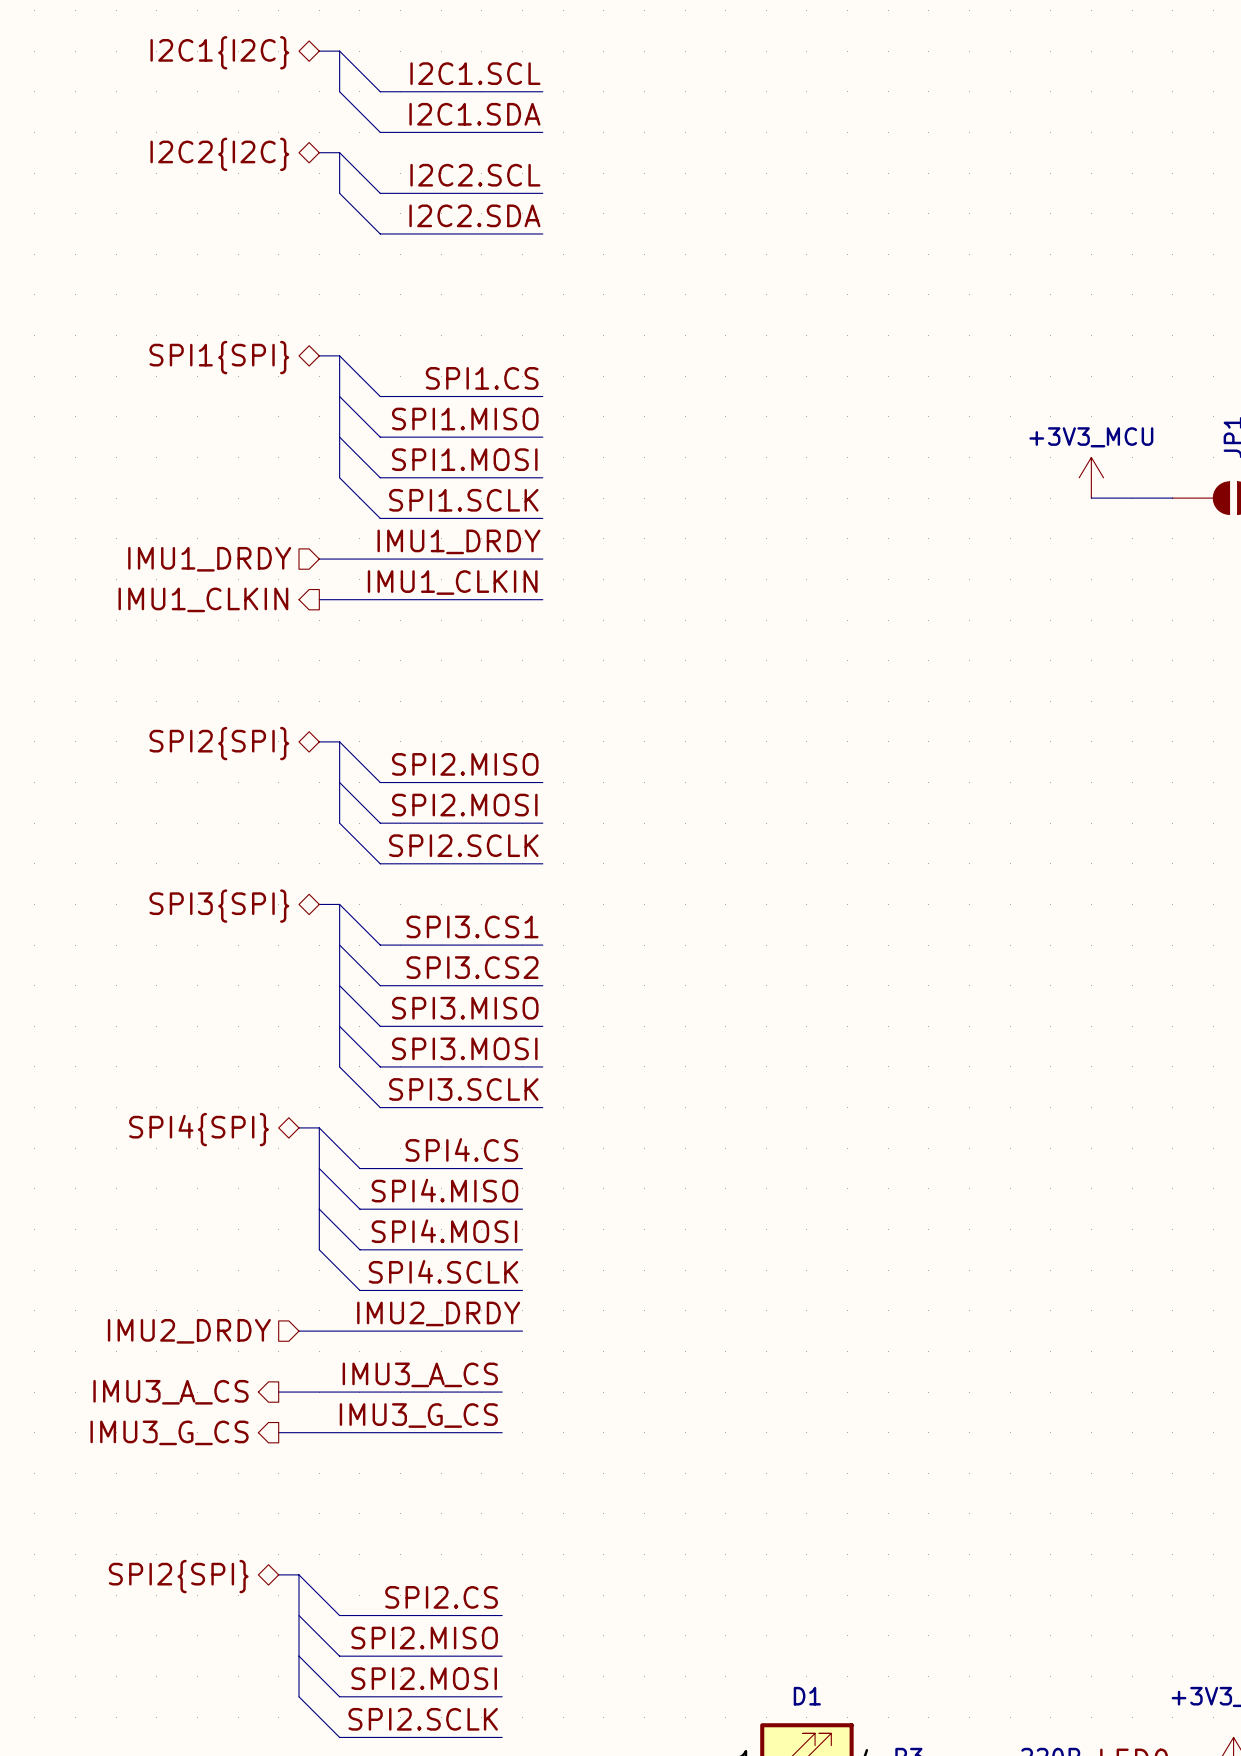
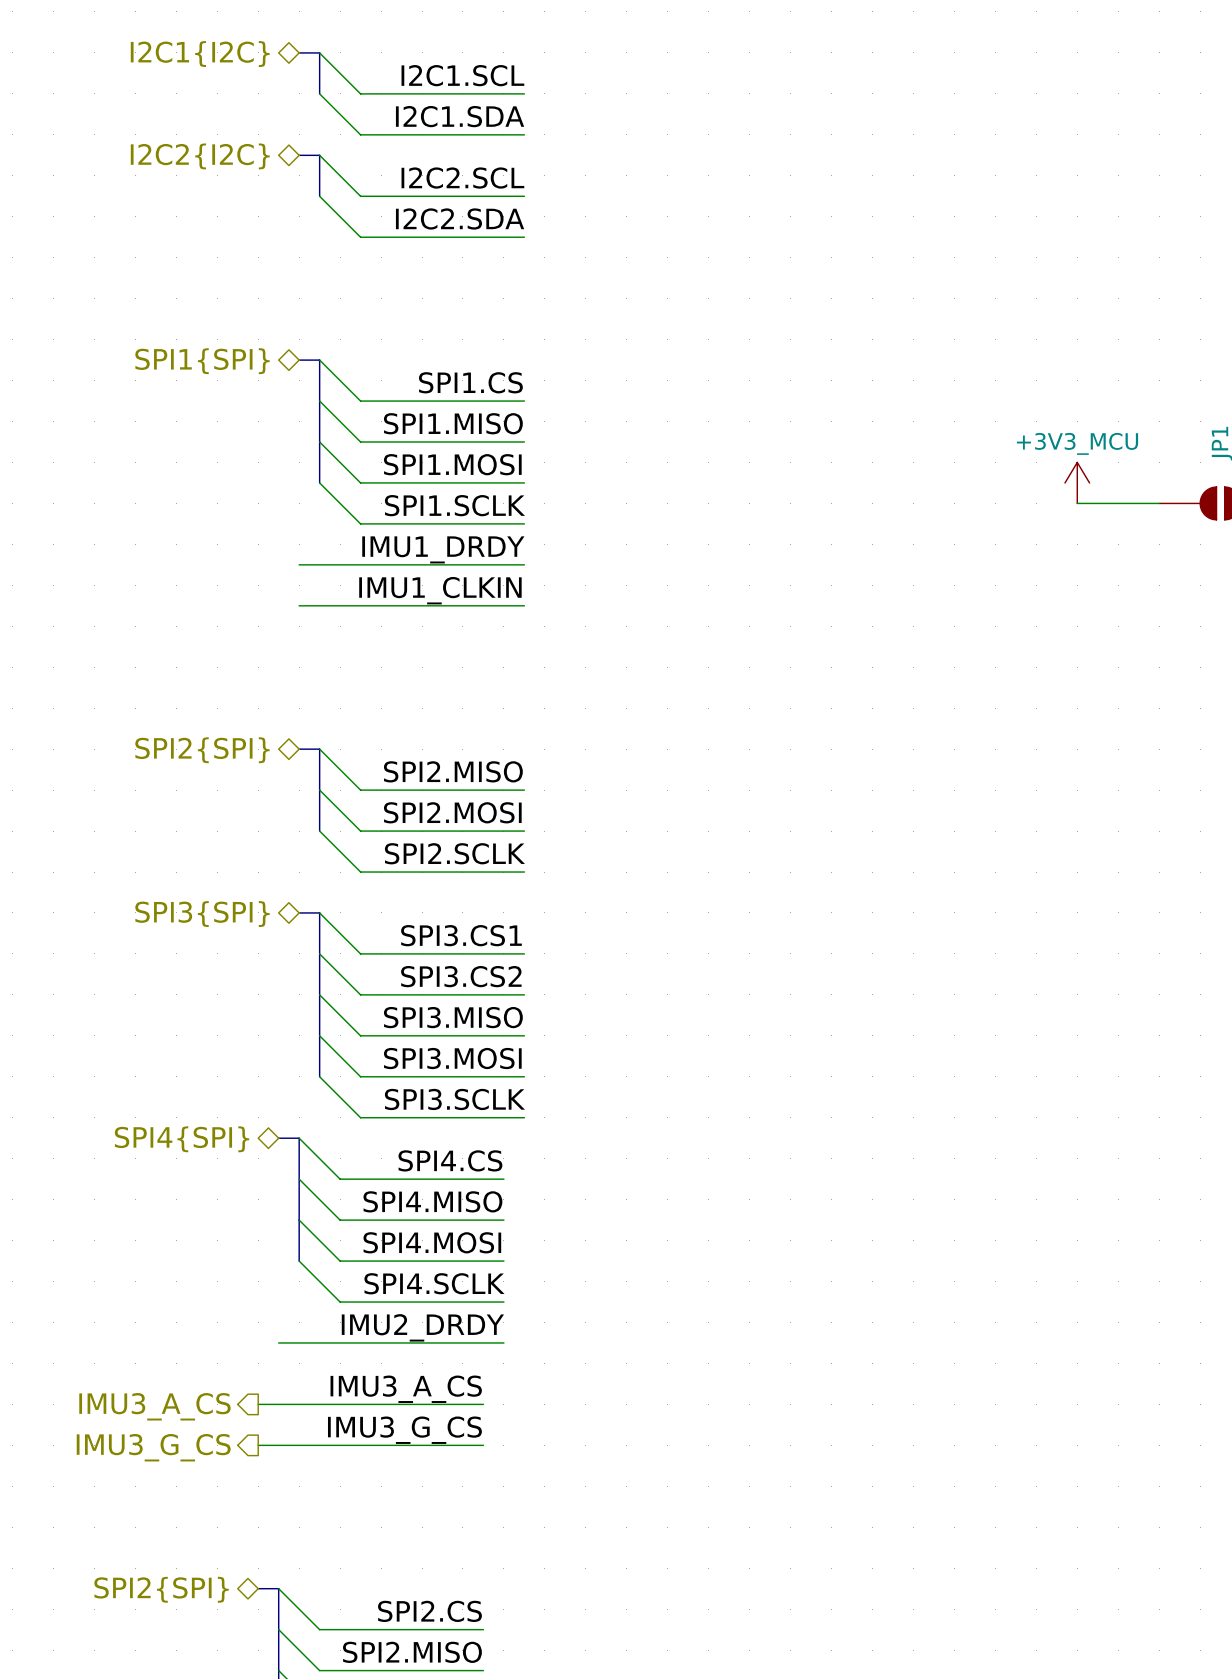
hierarchical label: IMU1_DRDY (209, 559) -> none
hierarchical label: IMU1_CLKIN (203, 599) -> none
hierarchical label: IMU2_DRDY (189, 1331) -> none

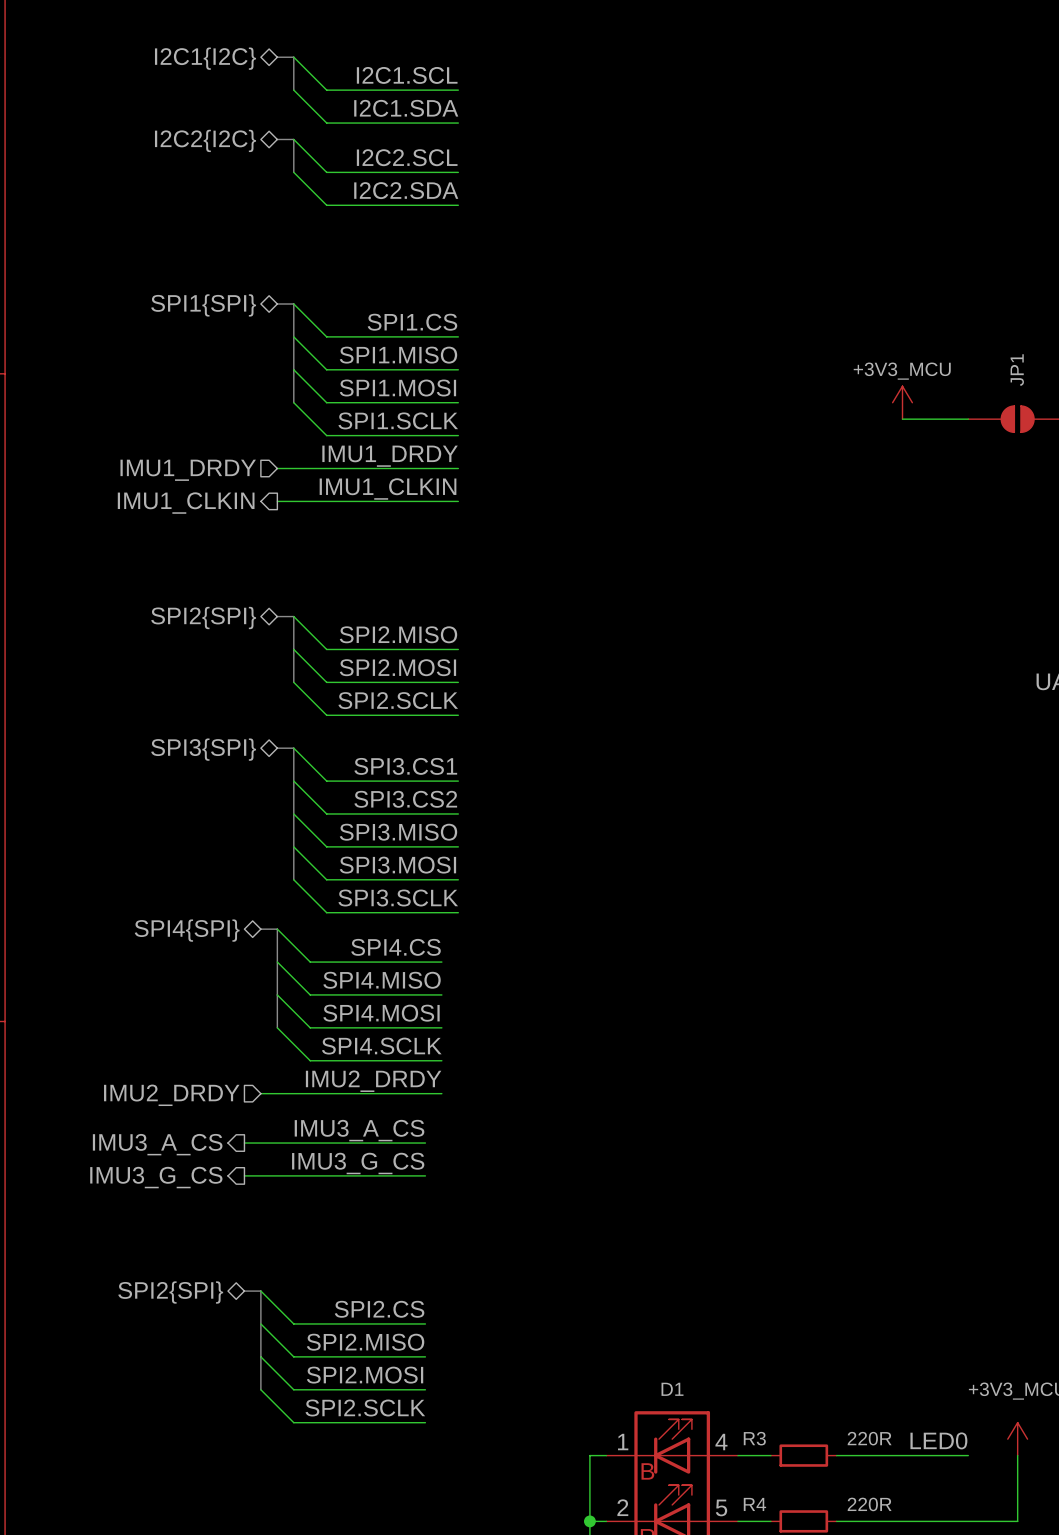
hierarchical label: none -> IMU1_DRDY (188, 470)
hierarchical label: none -> IMU1_CLKIN (186, 503)
hierarchical label: none -> IMU2_DRDY (171, 1095)

